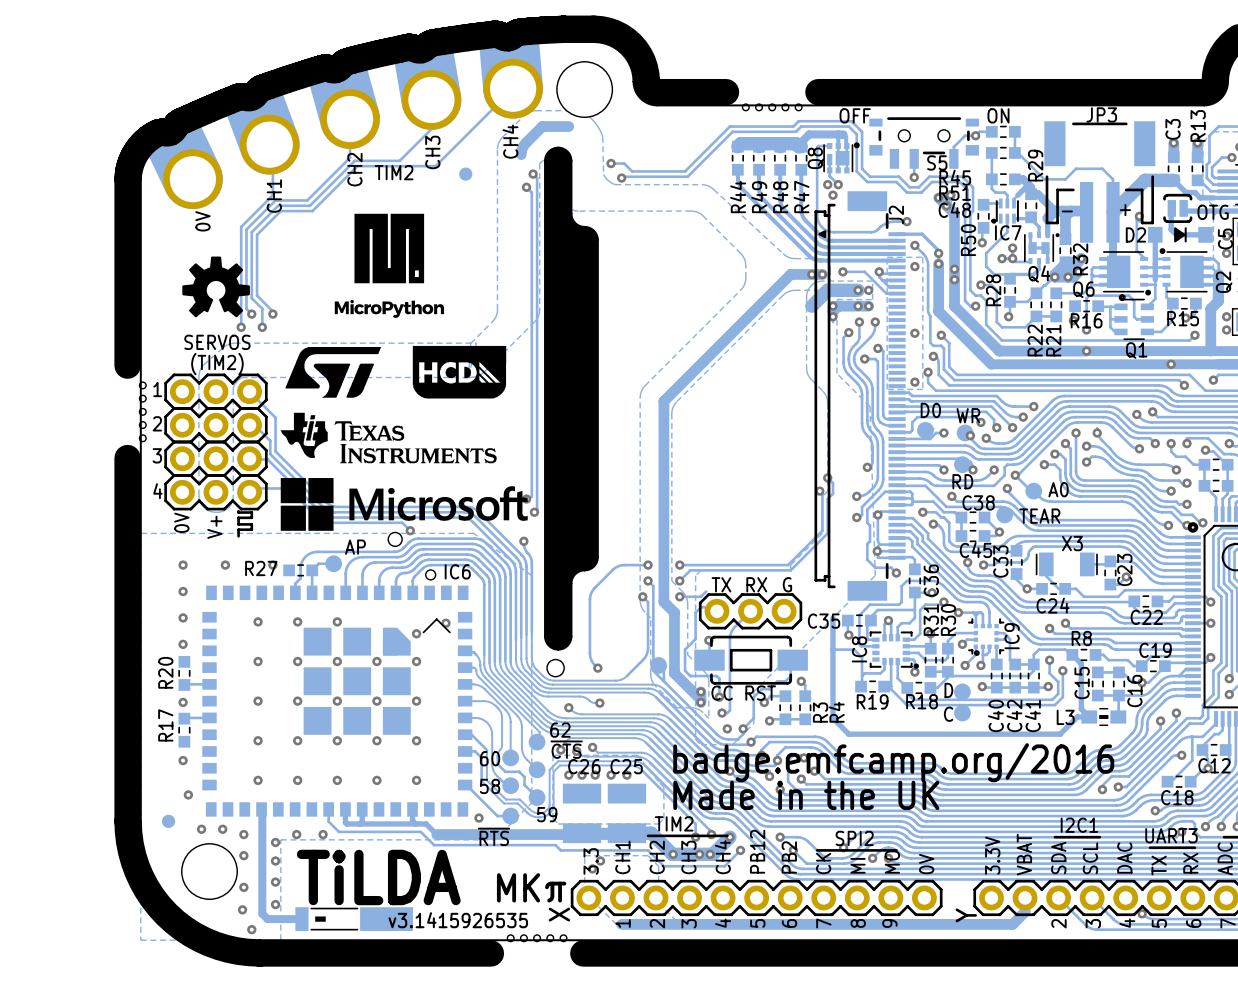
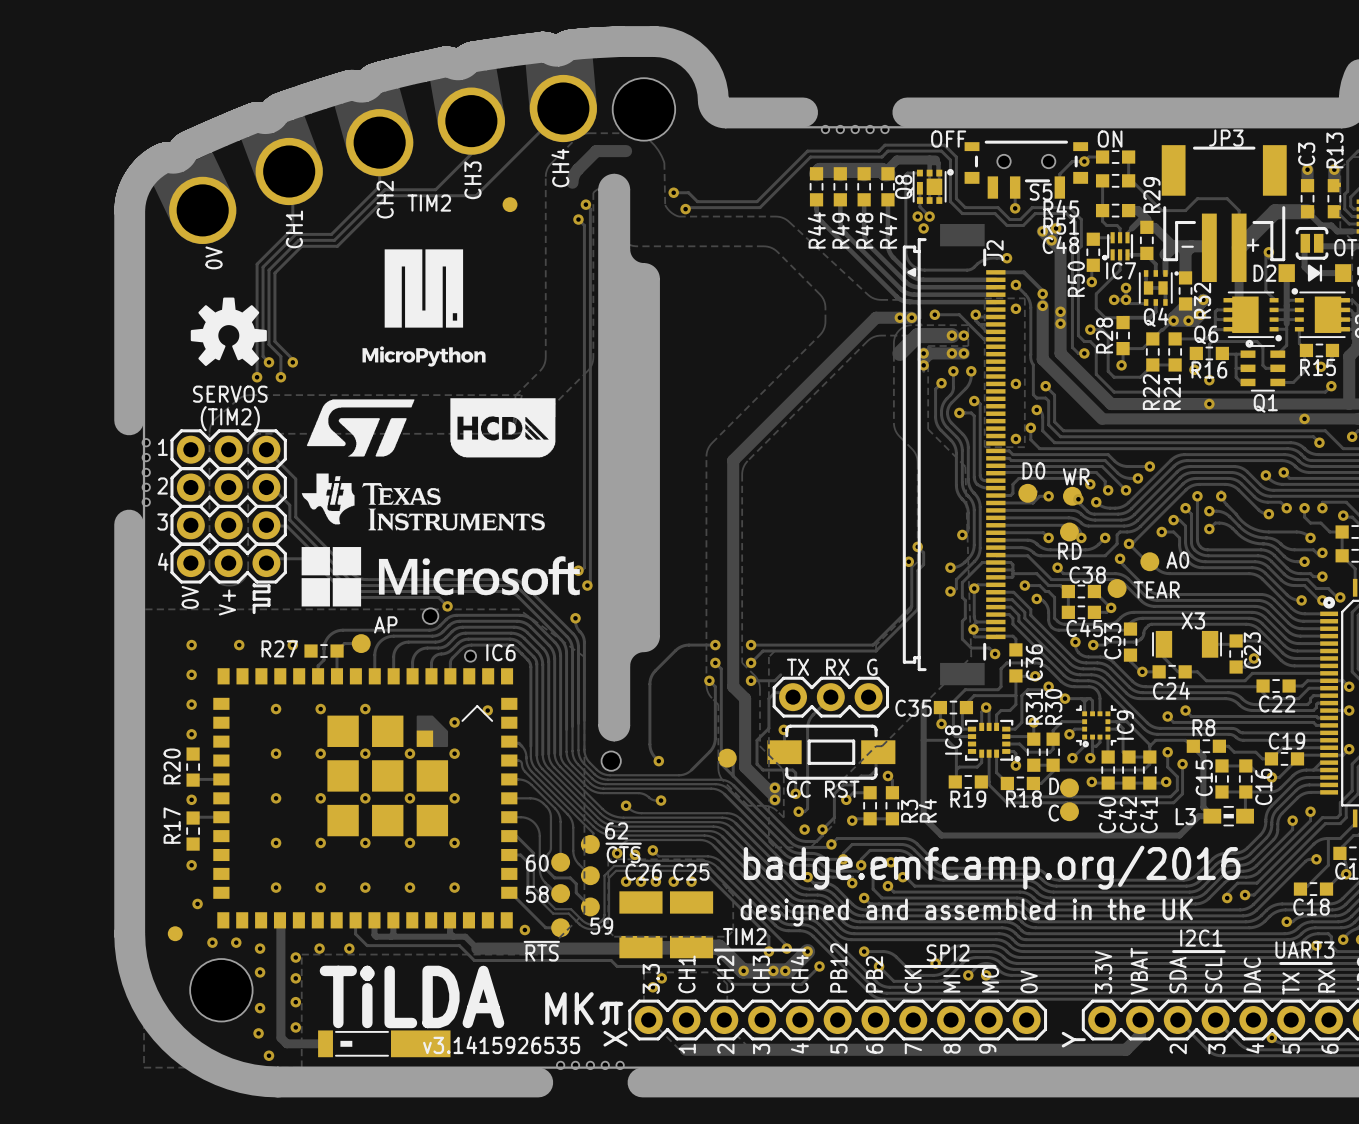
track: none -> (1116, 721) (1126, 721) (1149, 746)
text: Made in the UK (806, 795) -> designed and assembled in the UK (966, 912)

